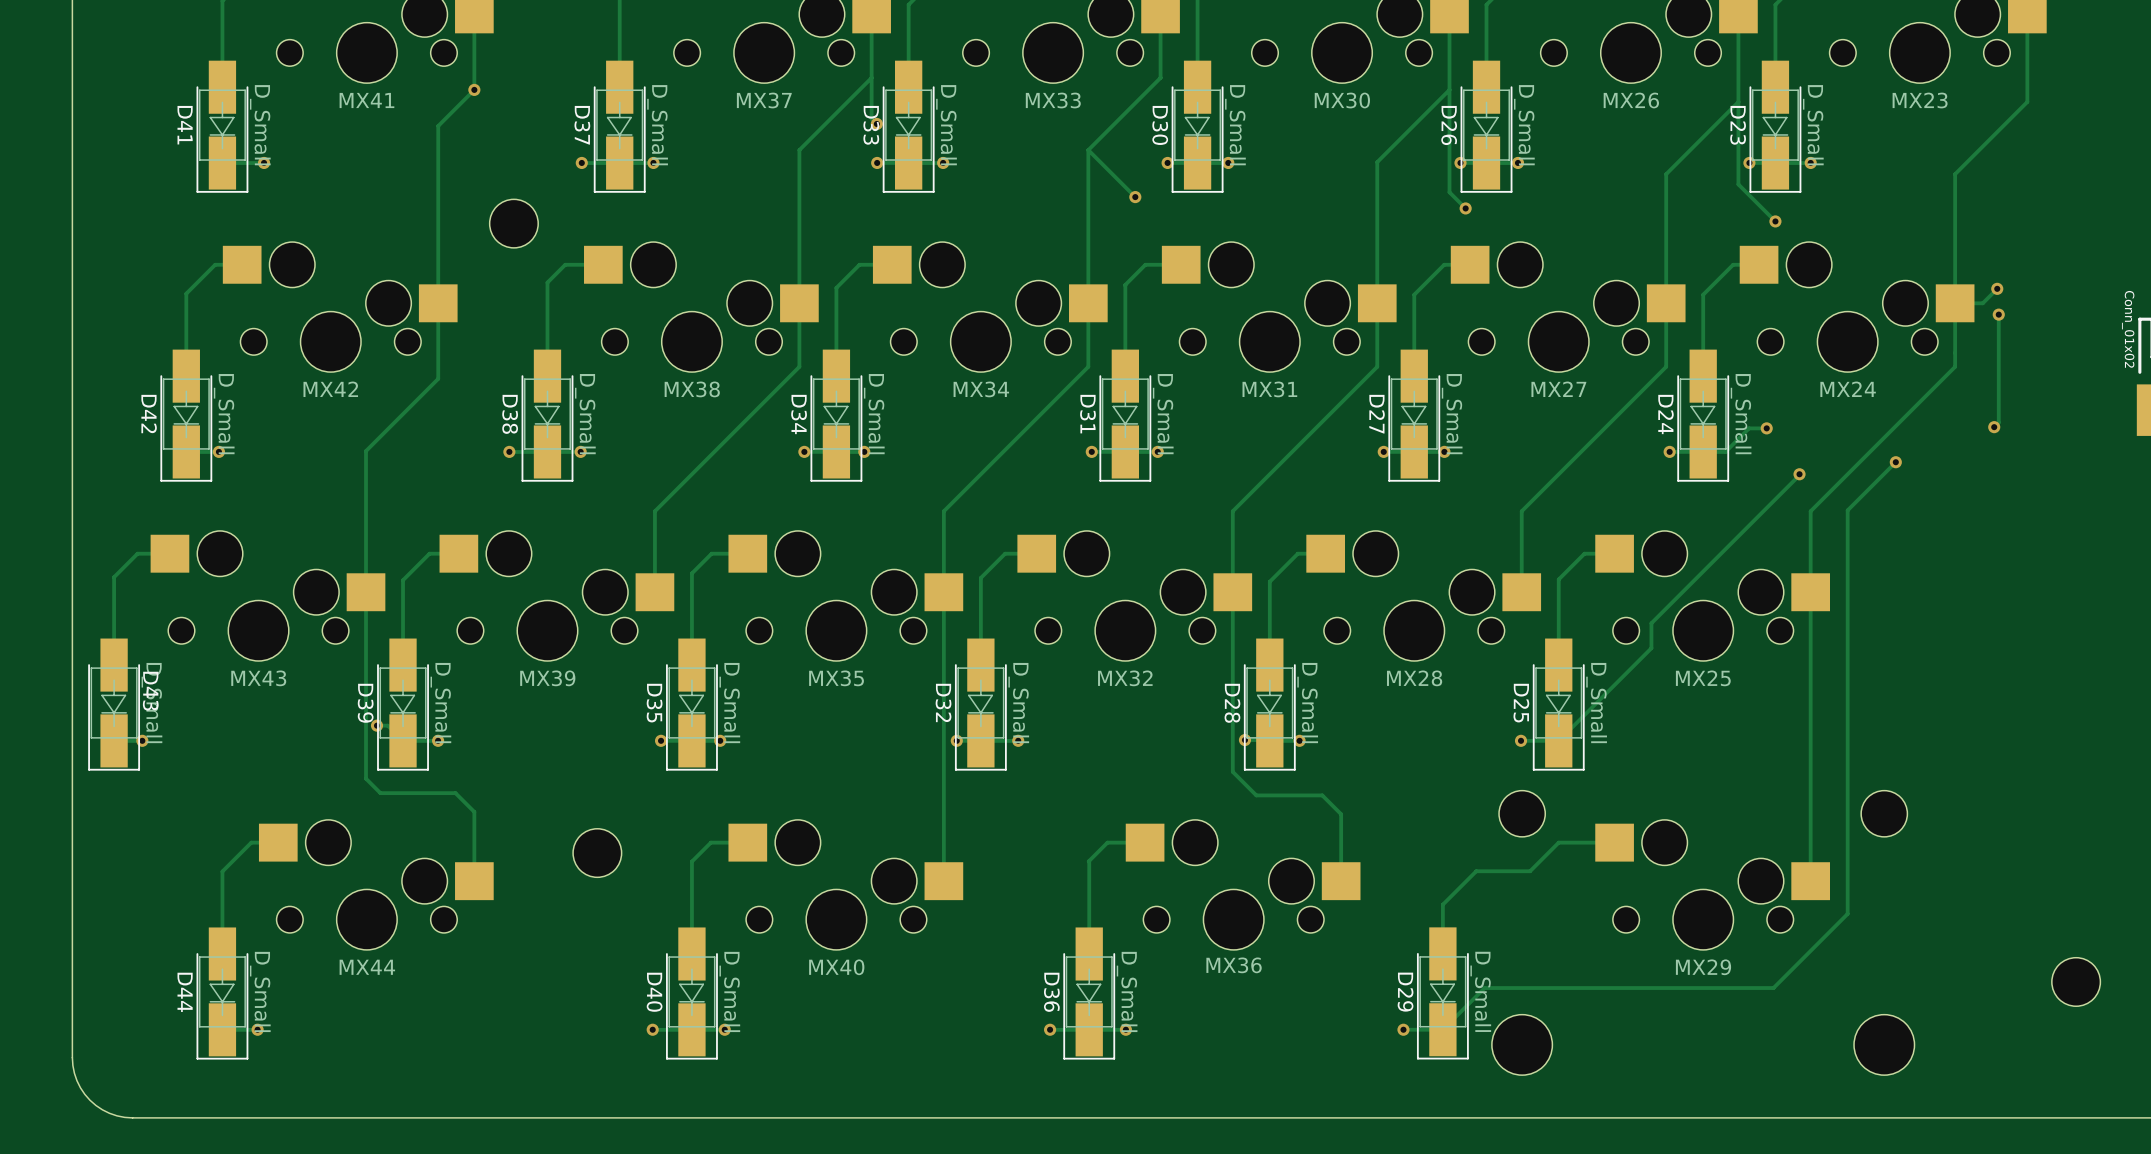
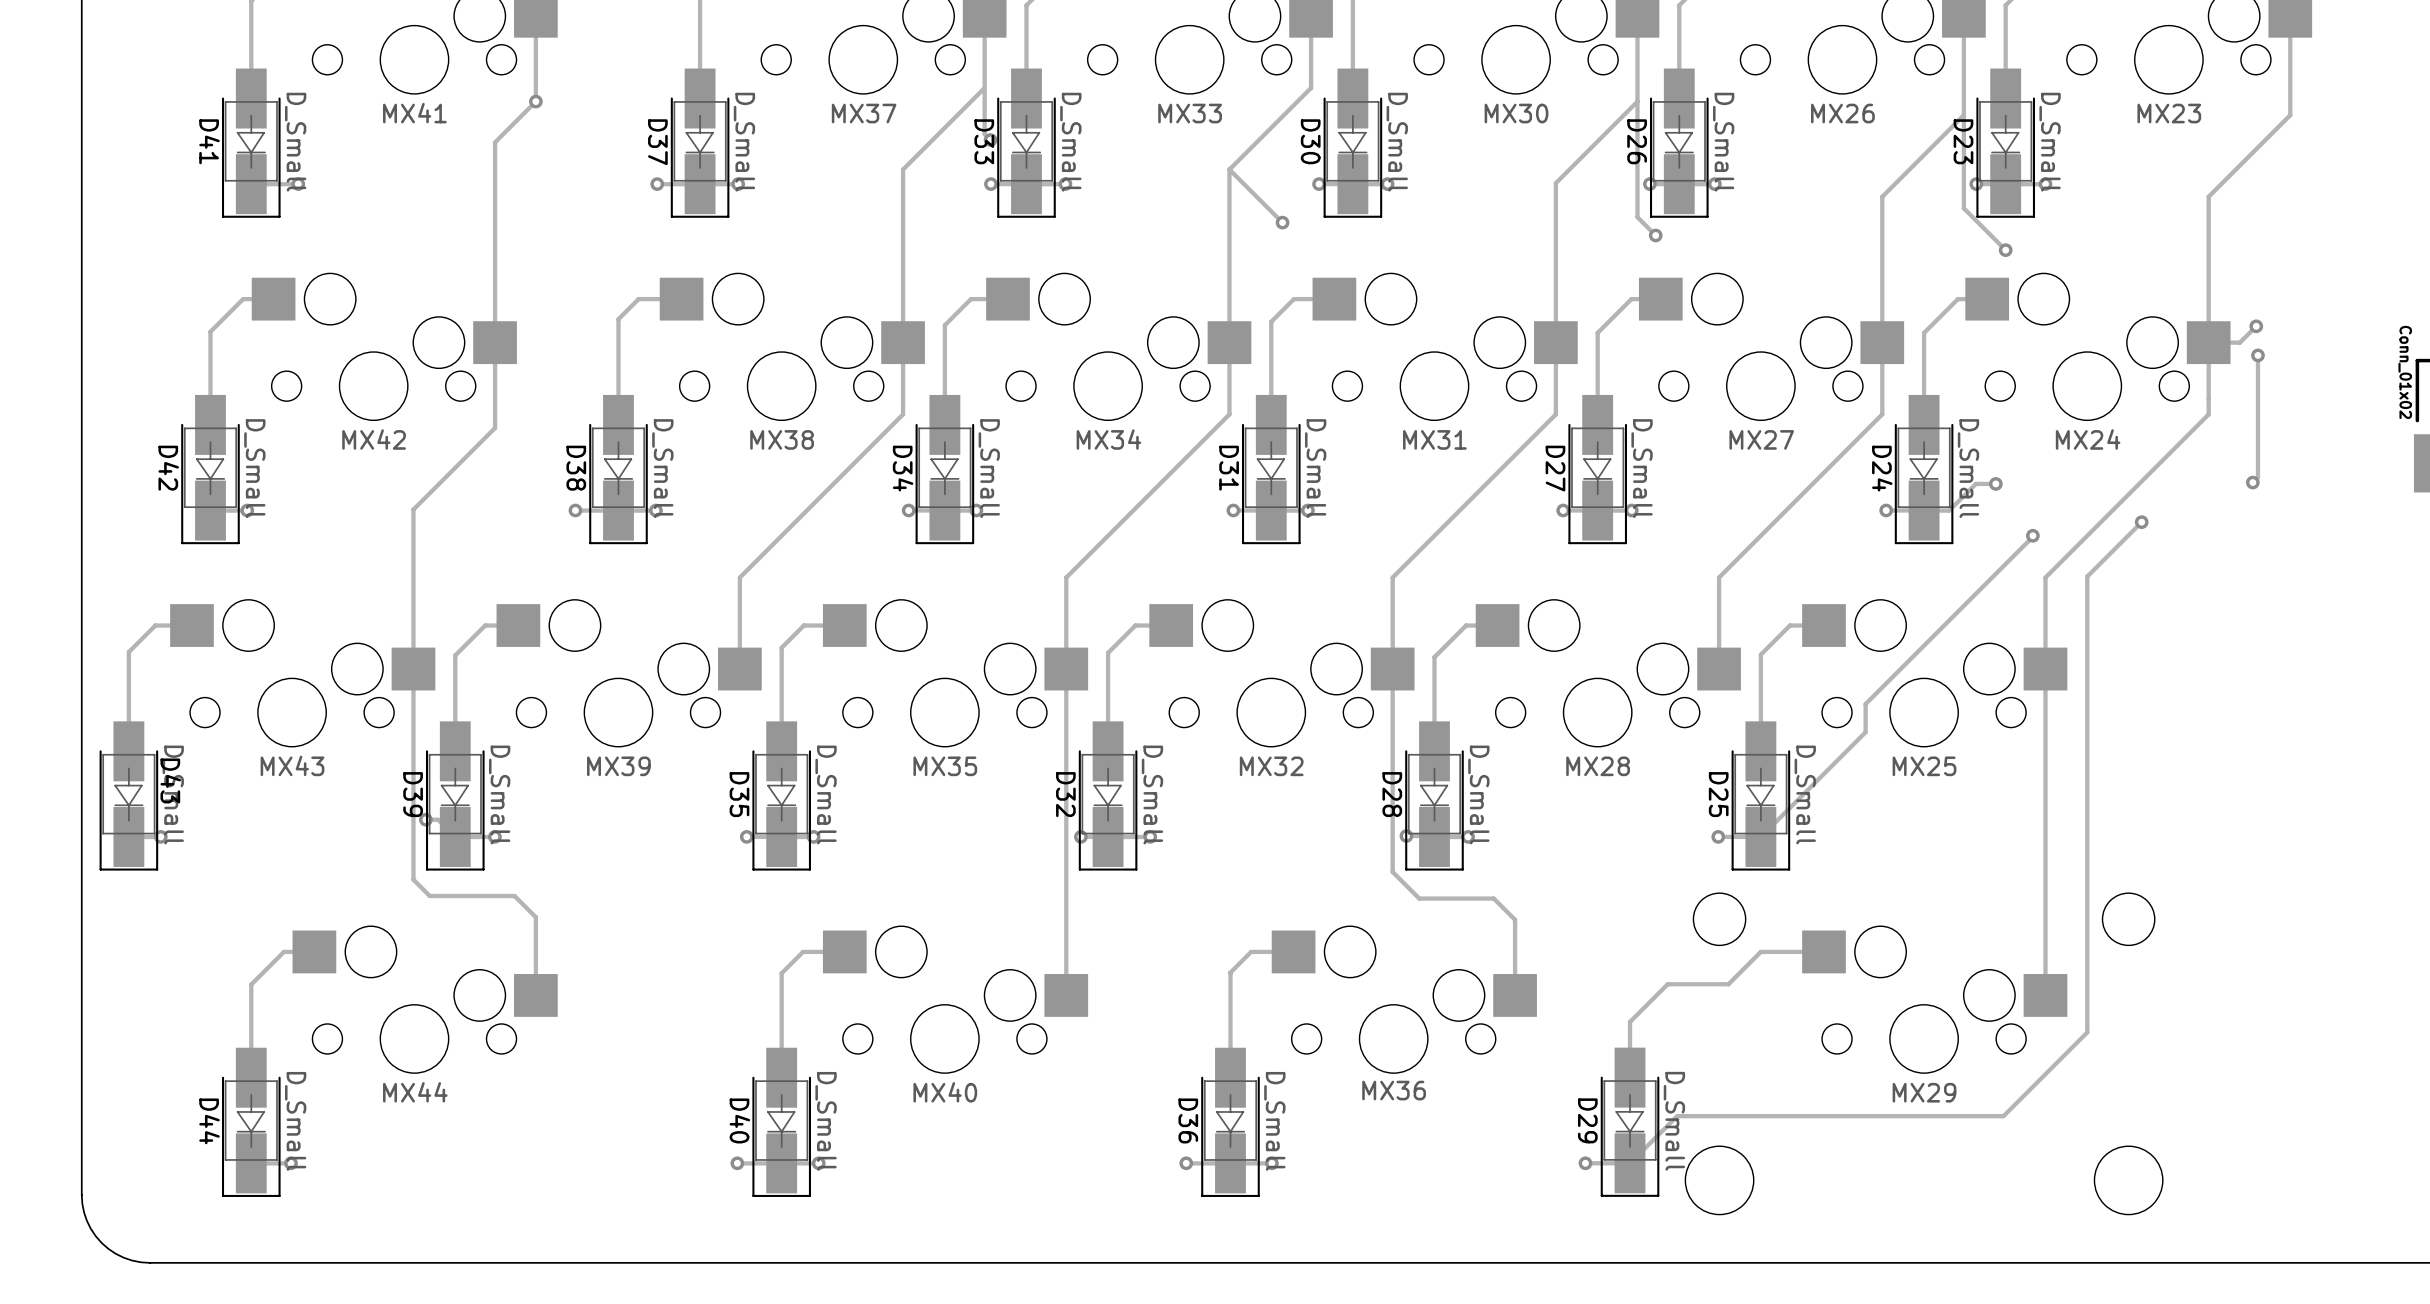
part: (513, 223) -> none
part: (597, 853) -> none
part: (2076, 981) -> none

